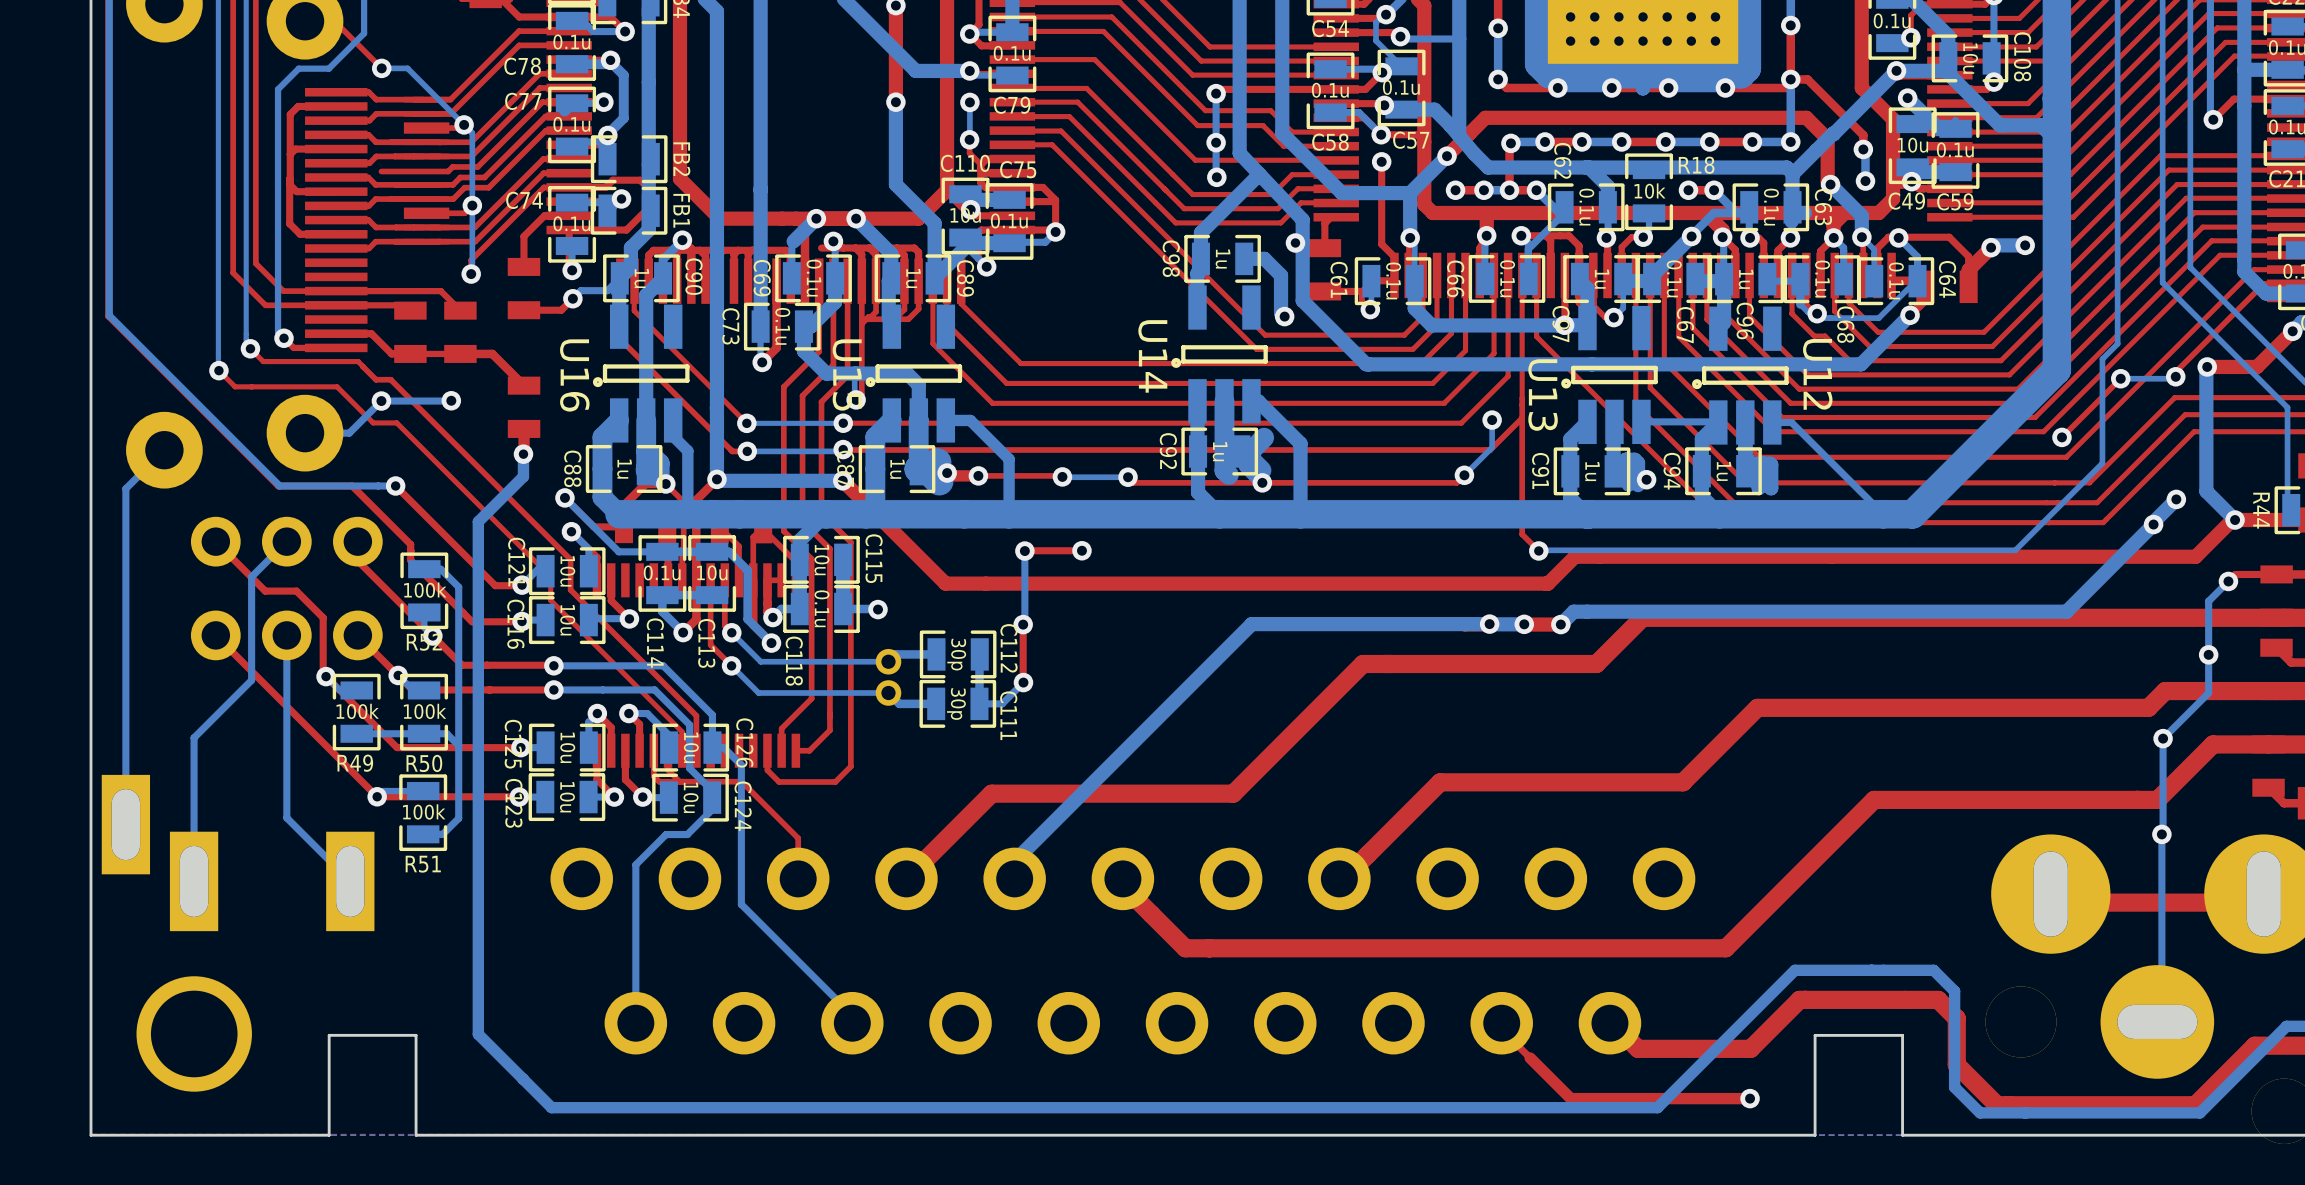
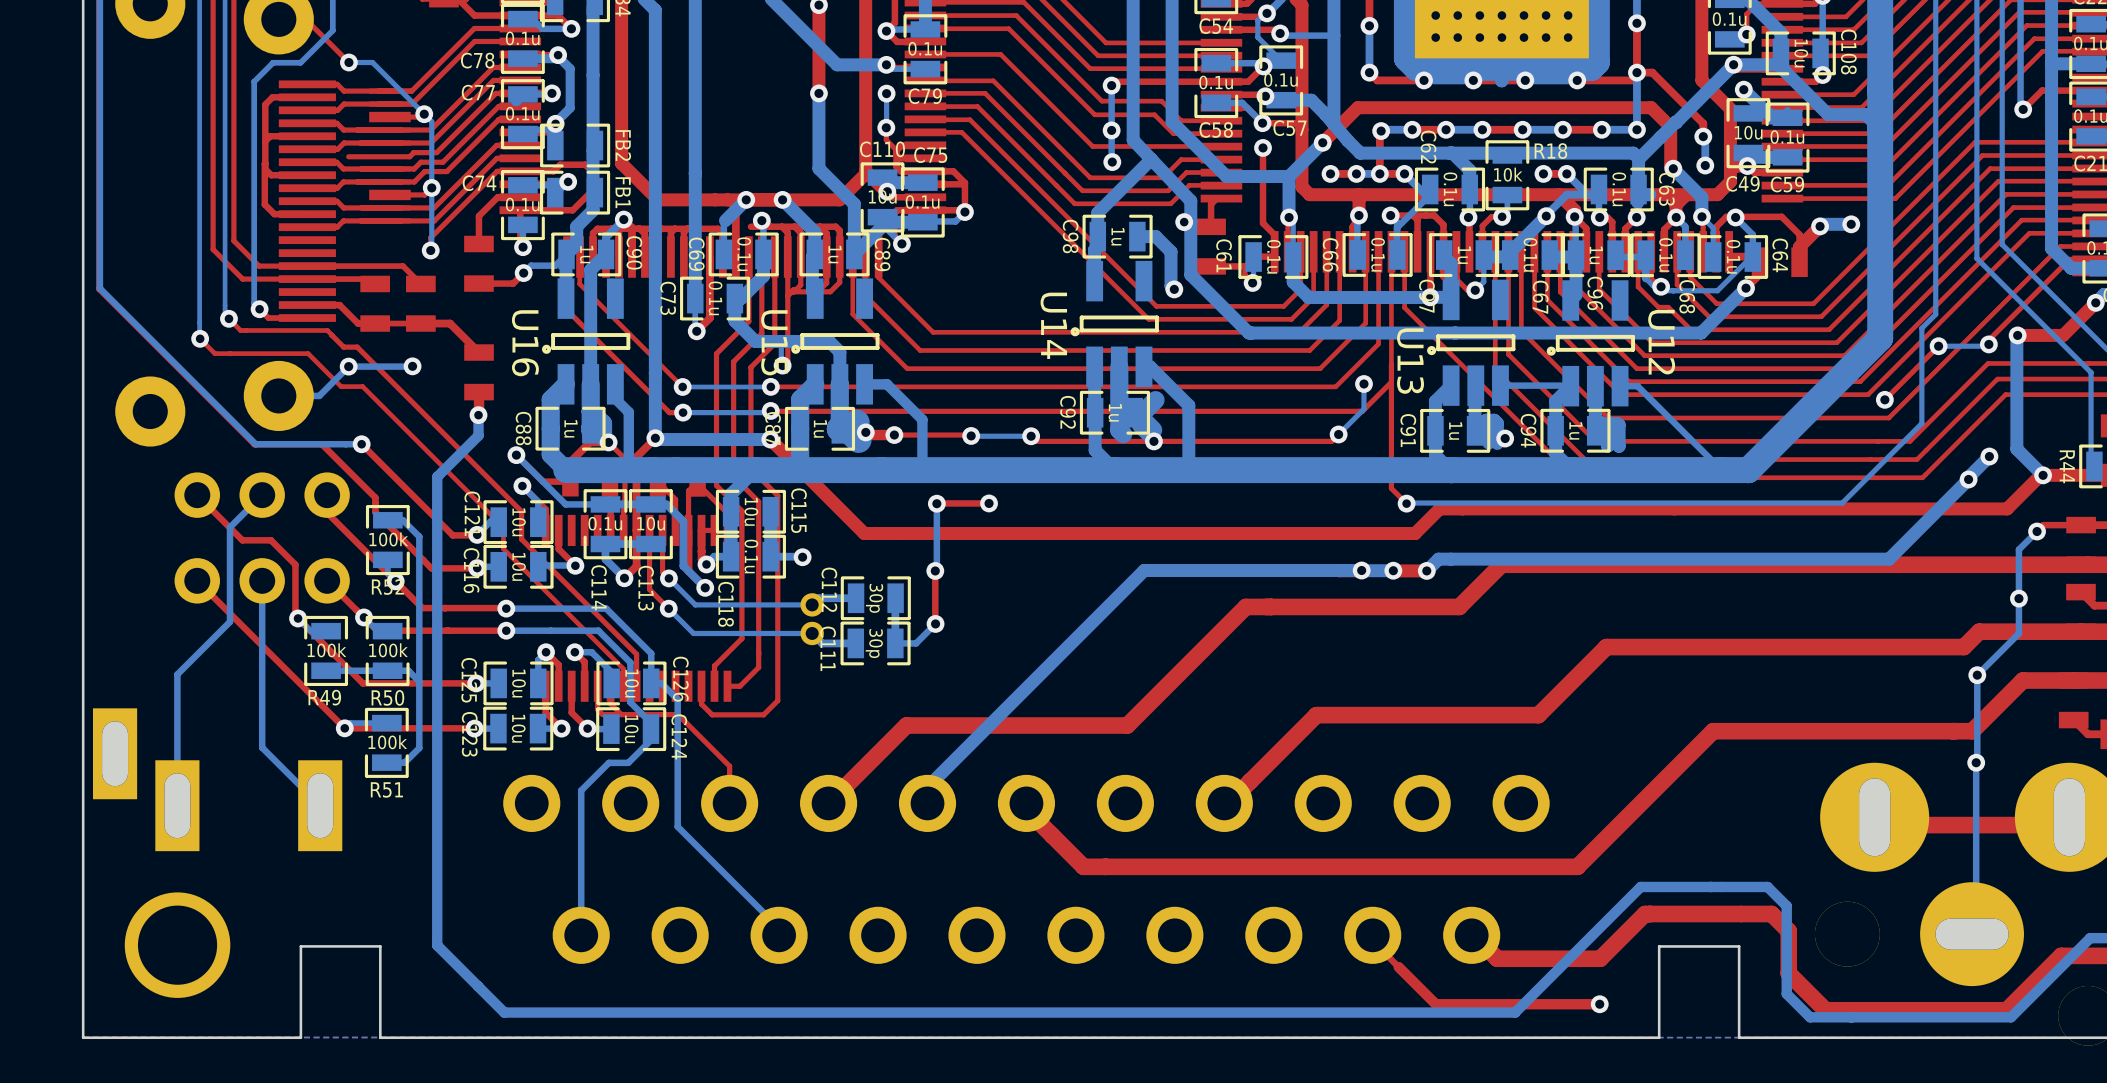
bottom track: (164, 450) (125, 488) (125, 824) -> none
C112 name position: C112 (1009, 648) -> C112 (829, 589)
C111 name position: C111 (1008, 715) -> C111 (828, 648)

